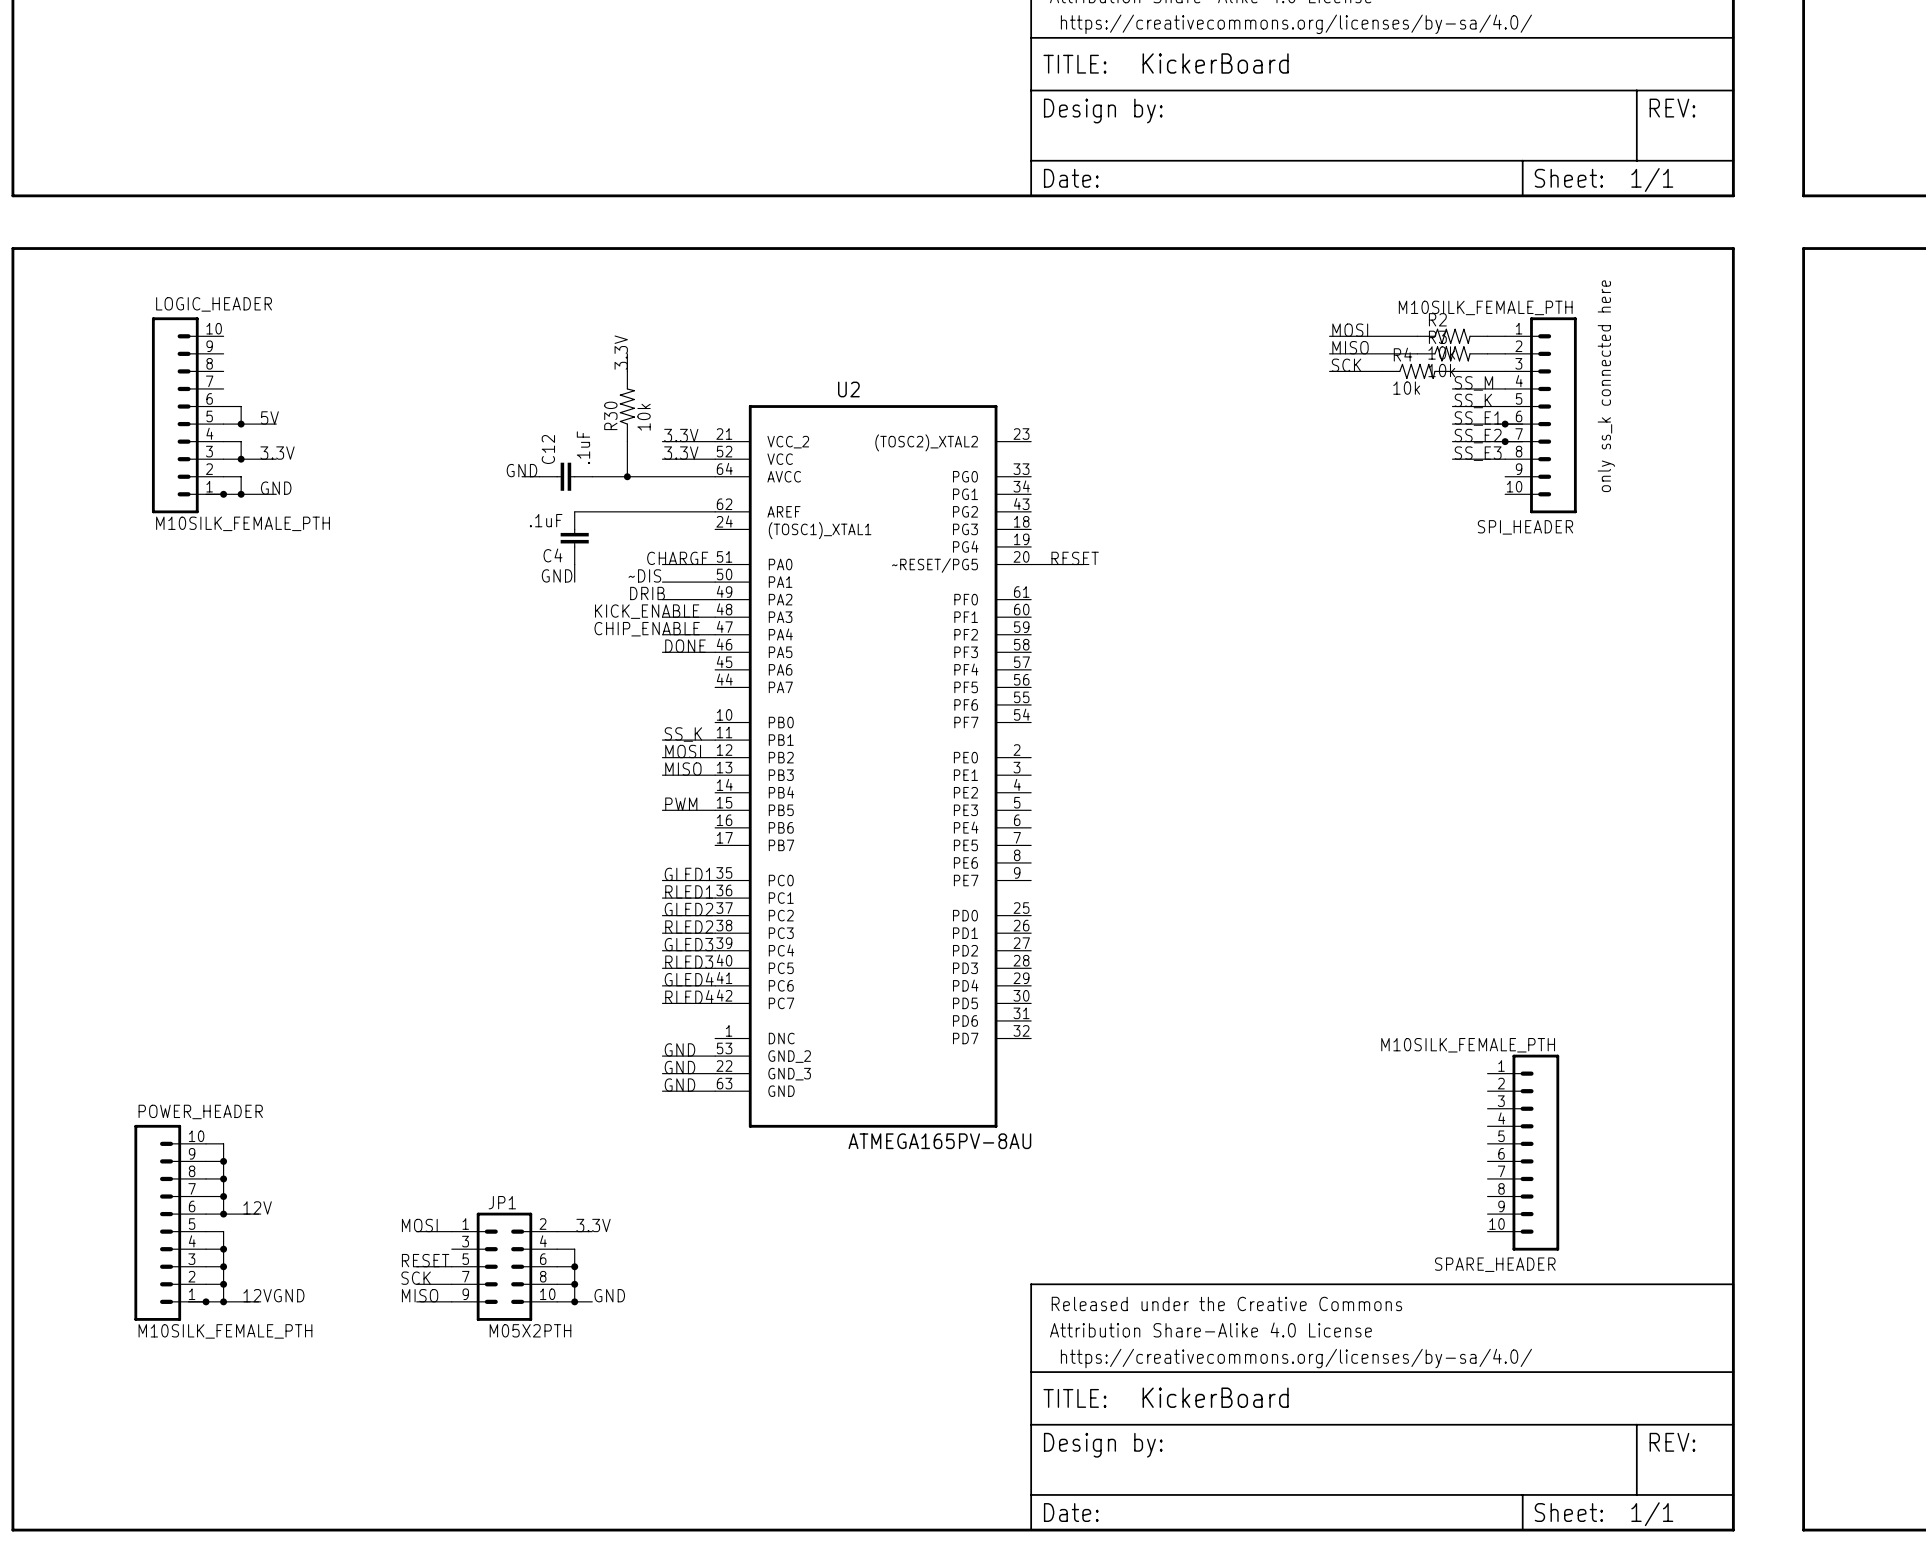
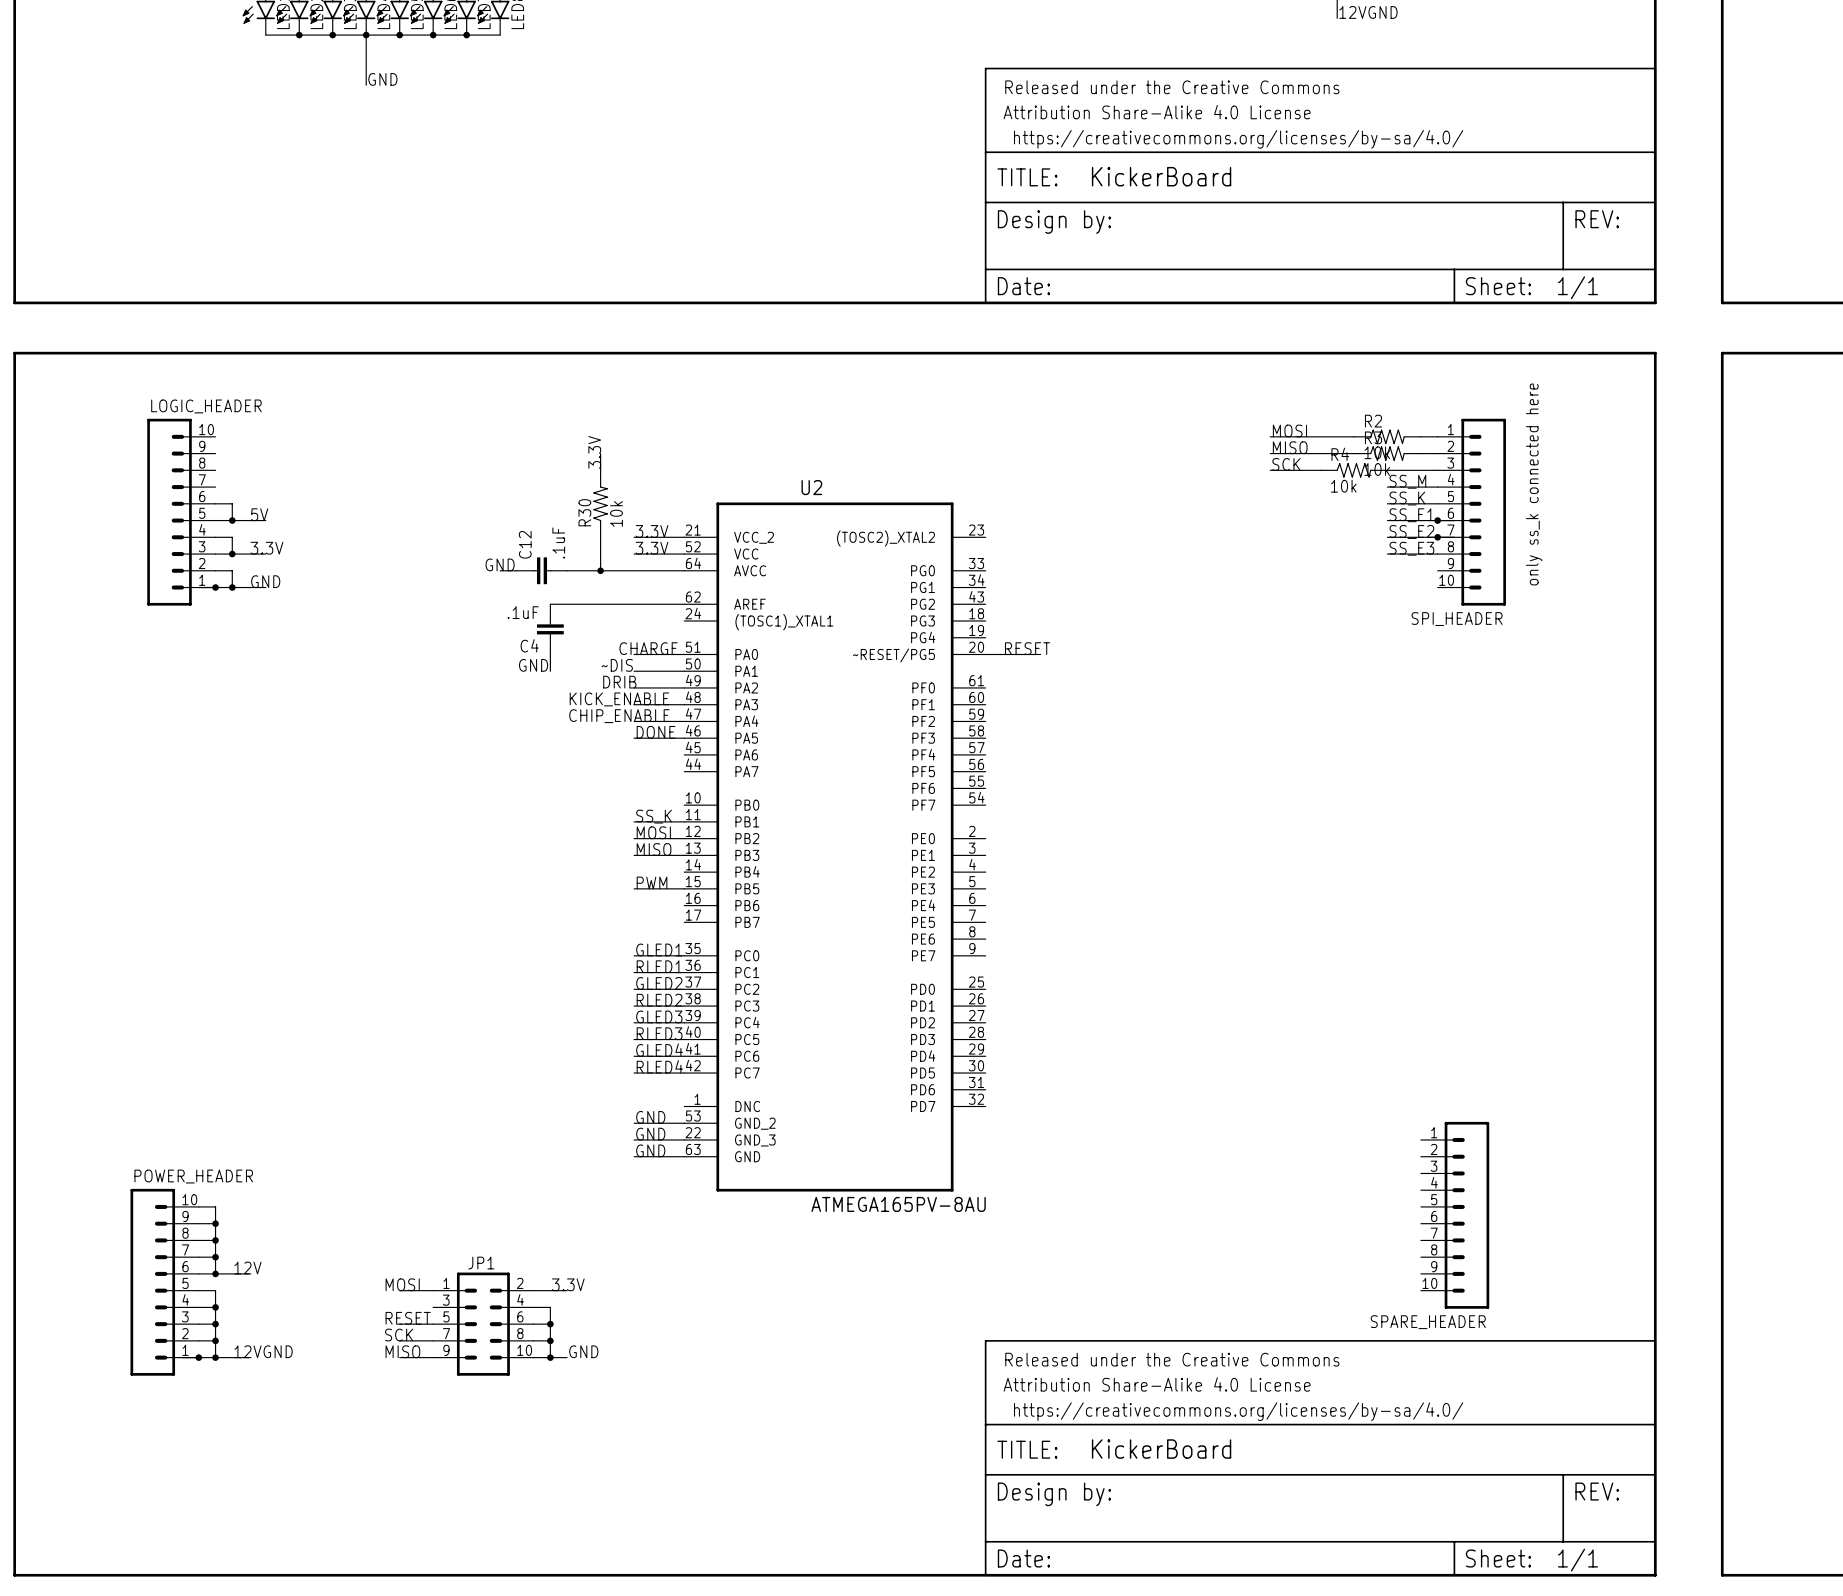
SPI_HEADER value: M10SILK_FEMALE_PTH (1485, 307) -> none
LOGIC_HEADER value: M10SILK_FEMALE_PTH (243, 523) -> none
SPARE_HEADER value: M10SILK_FEMALE_PTH (1468, 1045) -> none
JP1 value: M05X2PTH (530, 1330) -> none
POWER_HEADER value: M10SILK_FEMALE_PTH (225, 1331) -> none

